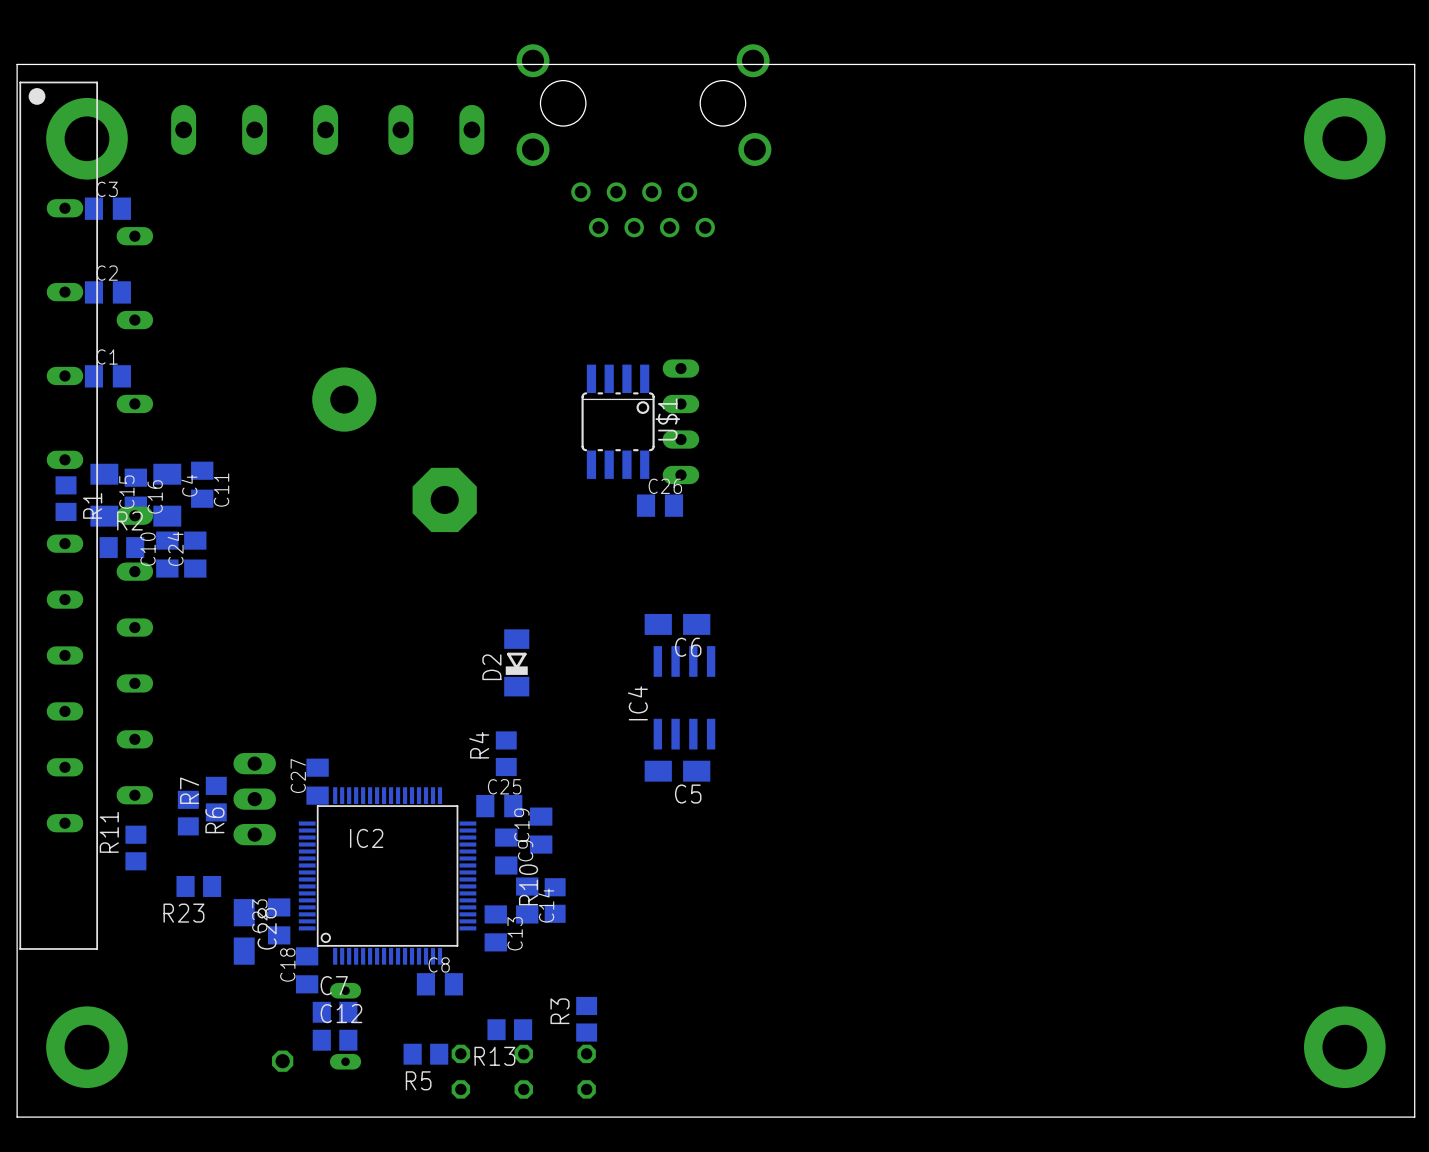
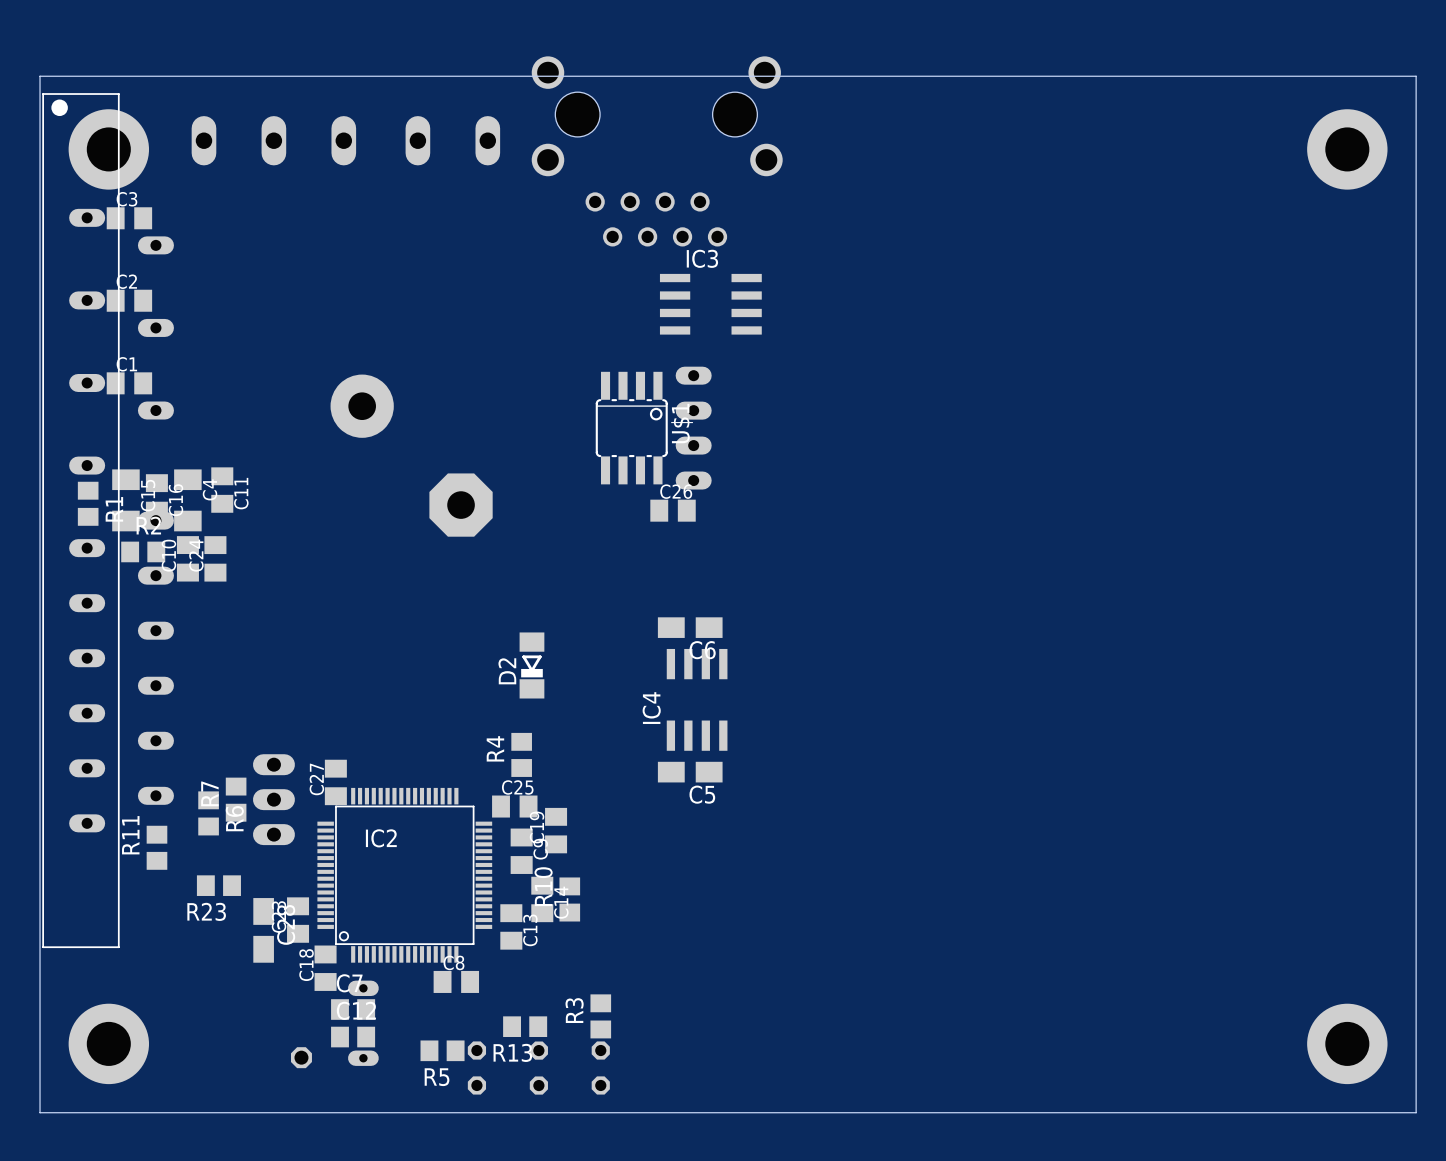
IC3: none -> (710, 304)

